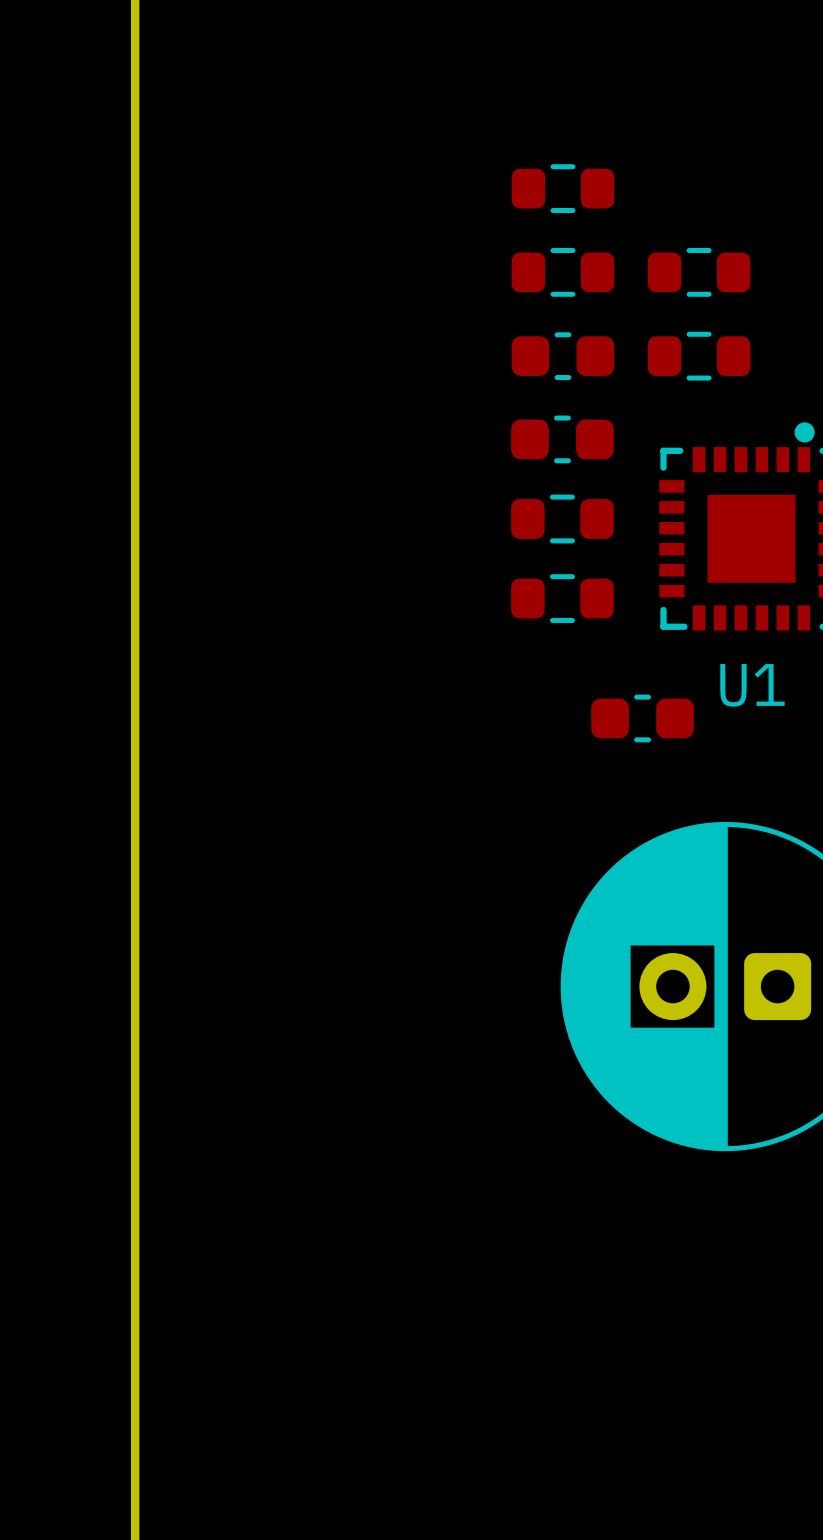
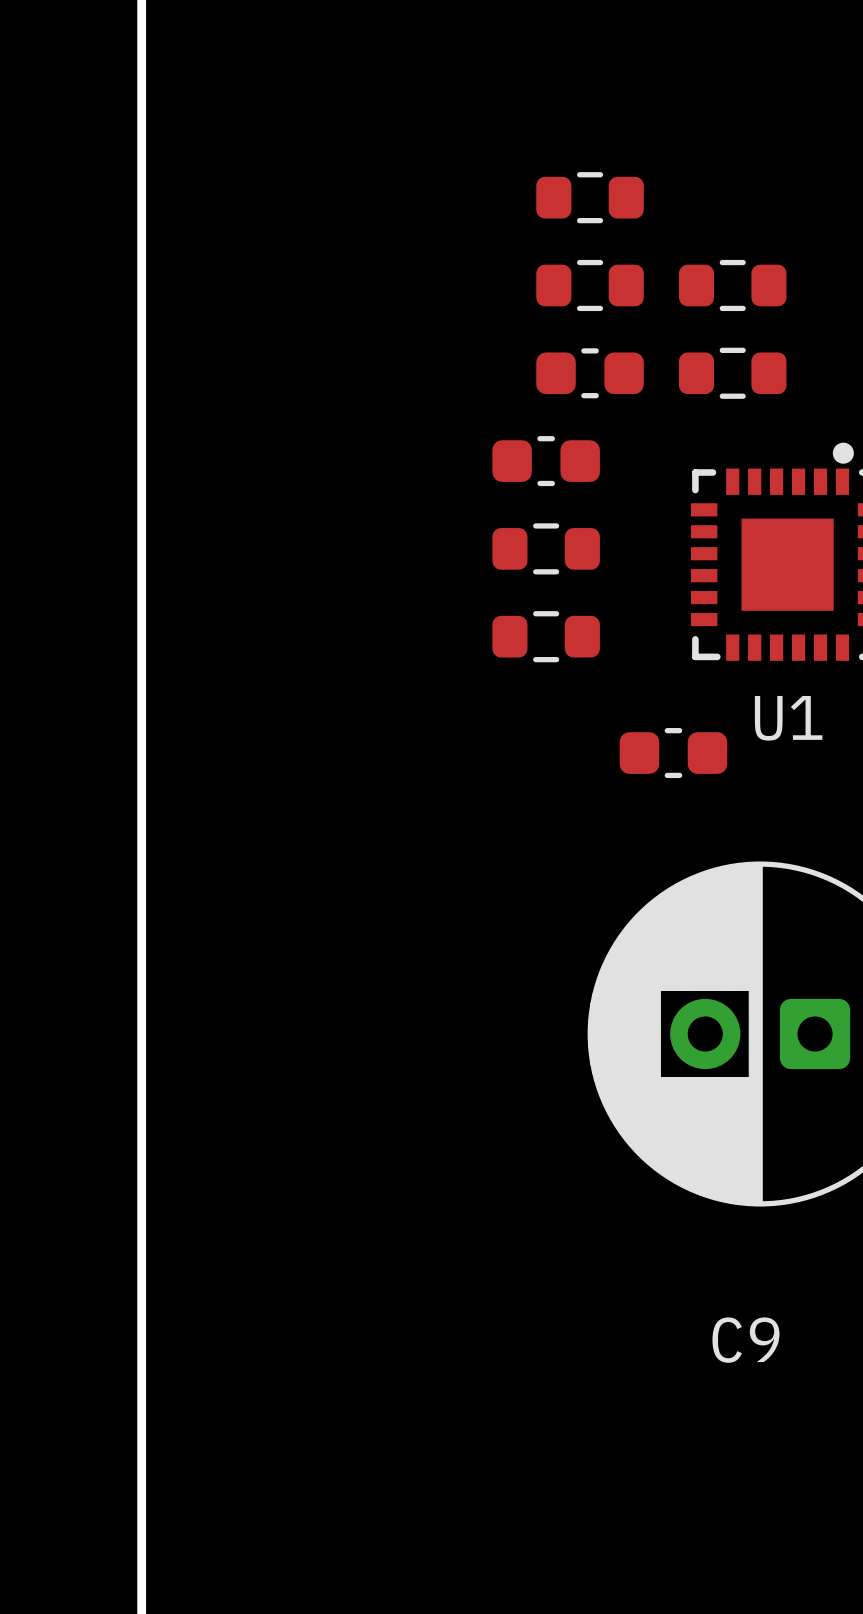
part position: (562, 439) -> (546, 461)
part position: (562, 518) -> (546, 548)
part position: (562, 598) -> (546, 636)
C9 name: none -> C9 (745, 1340)

